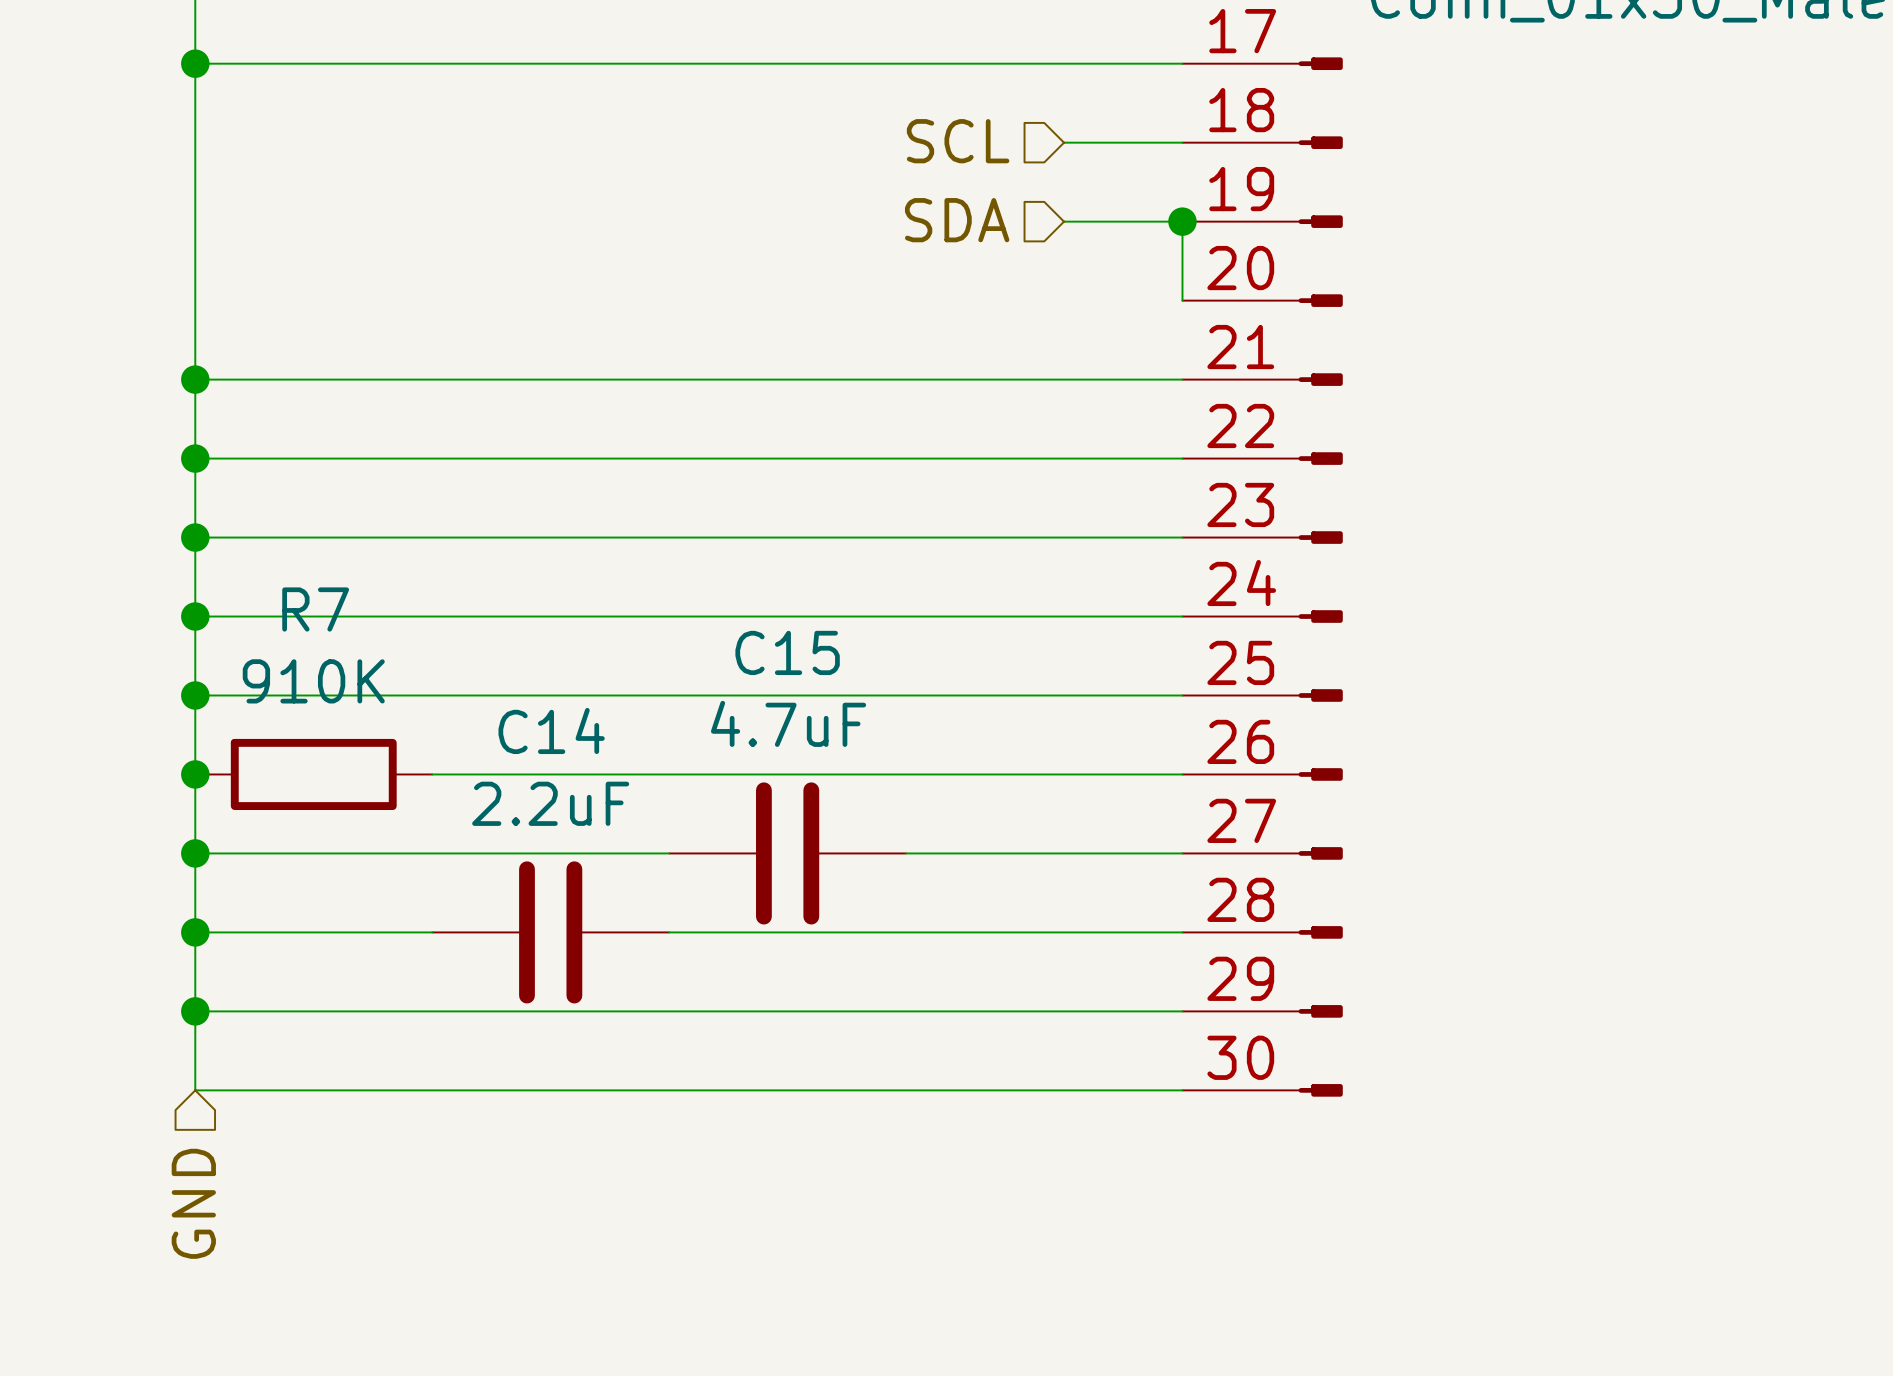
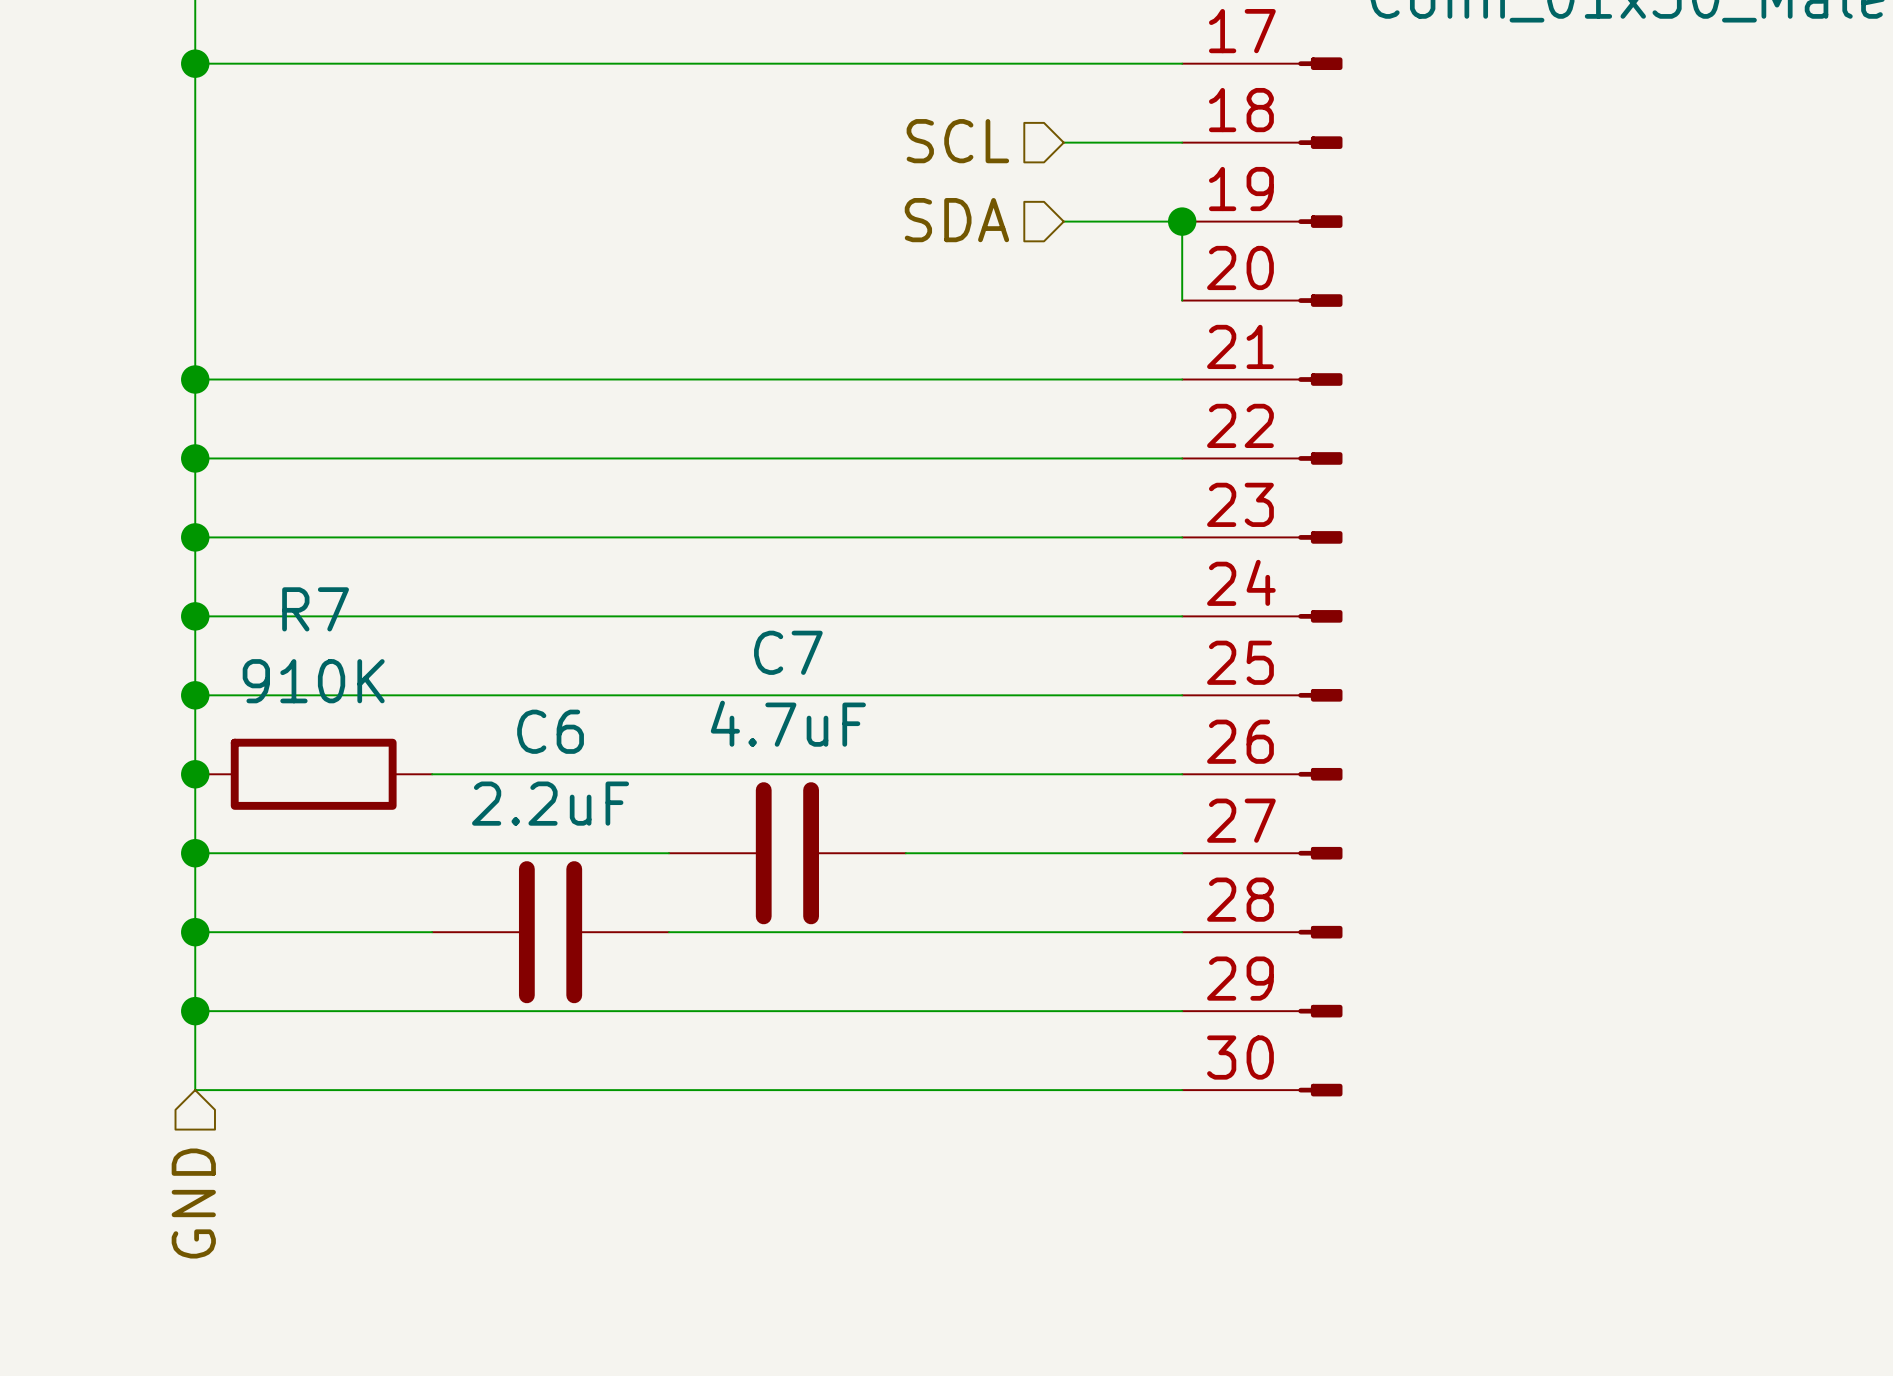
C15 name: C15 (787, 652) -> C7 (788, 652)
C14 name: C14 (551, 730) -> C6 (550, 731)

